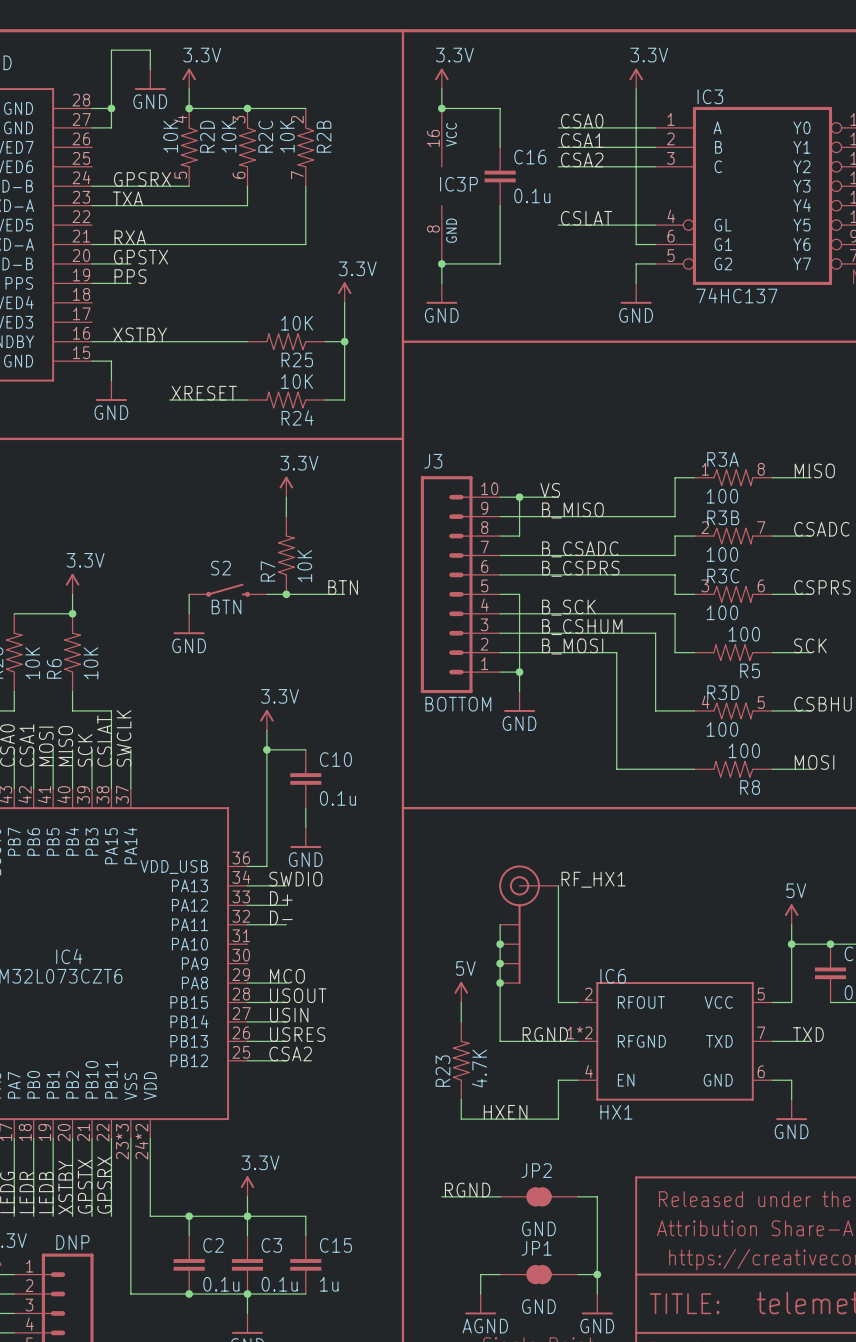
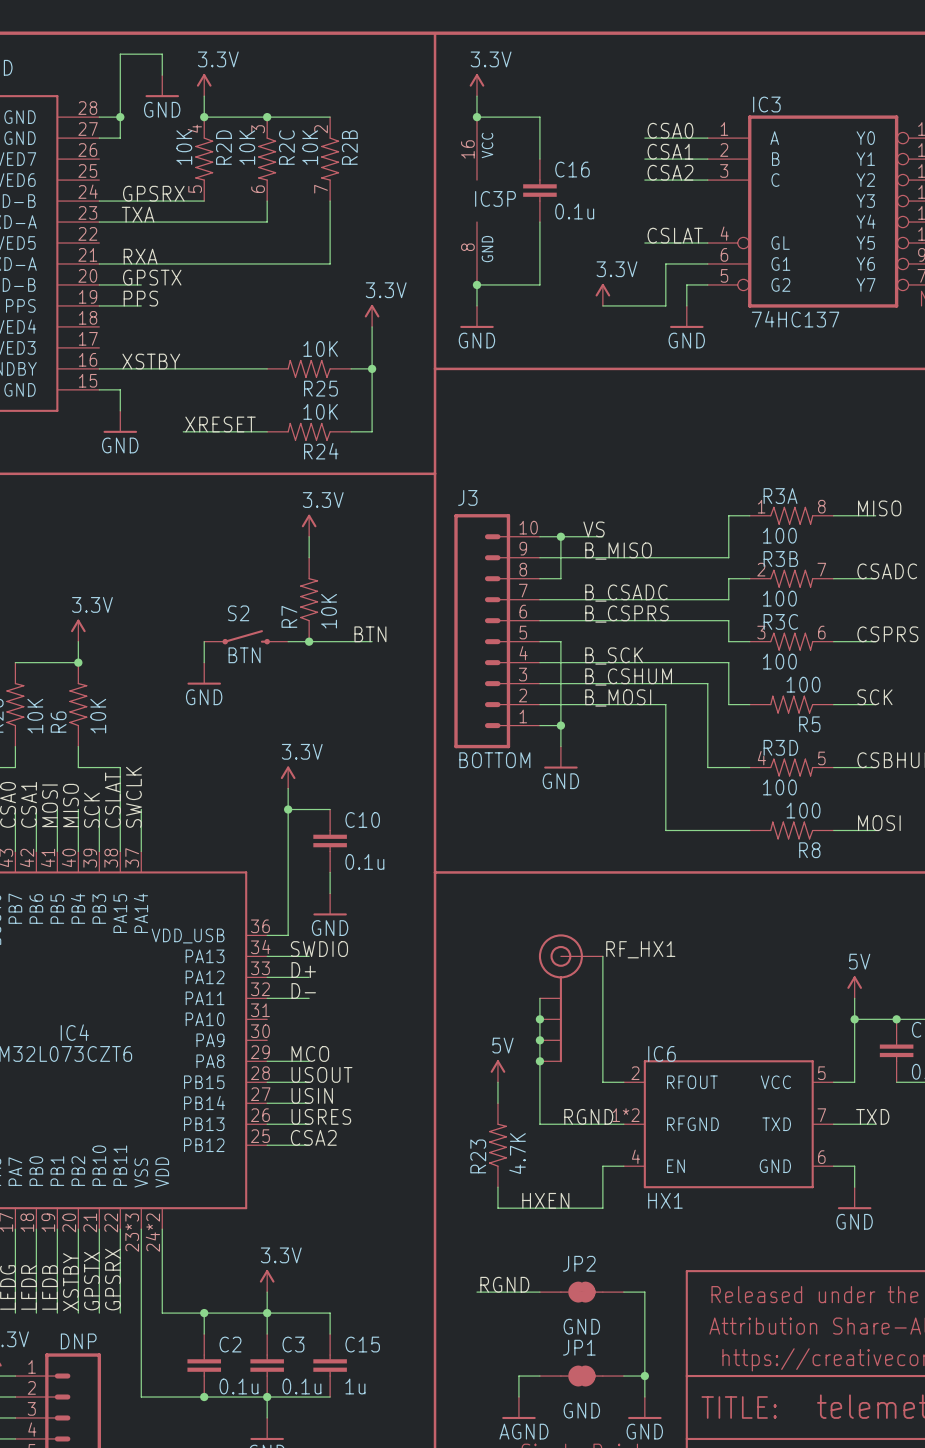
power symbol: 3.3V (636, 78) -> none
wire: (636, 89) (636, 244) -> (602, 305) (665, 305) (665, 263) (686, 263)
label position: CSA0 (582, 121) -> CSA0 (670, 130)
wire: (558, 127) (597, 127) -> none
label position: CSA1 (582, 140) -> CSA1 (670, 151)
wire: (558, 147) (597, 147) -> none
label position: CSA2 (582, 159) -> CSA2 (670, 172)
wire: (558, 166) (597, 166) -> none
label position: CSLAT (586, 218) -> CSLAT (675, 235)
wire: (558, 225) (597, 225) -> none
power symbol: none -> 3.3V (602, 294)

